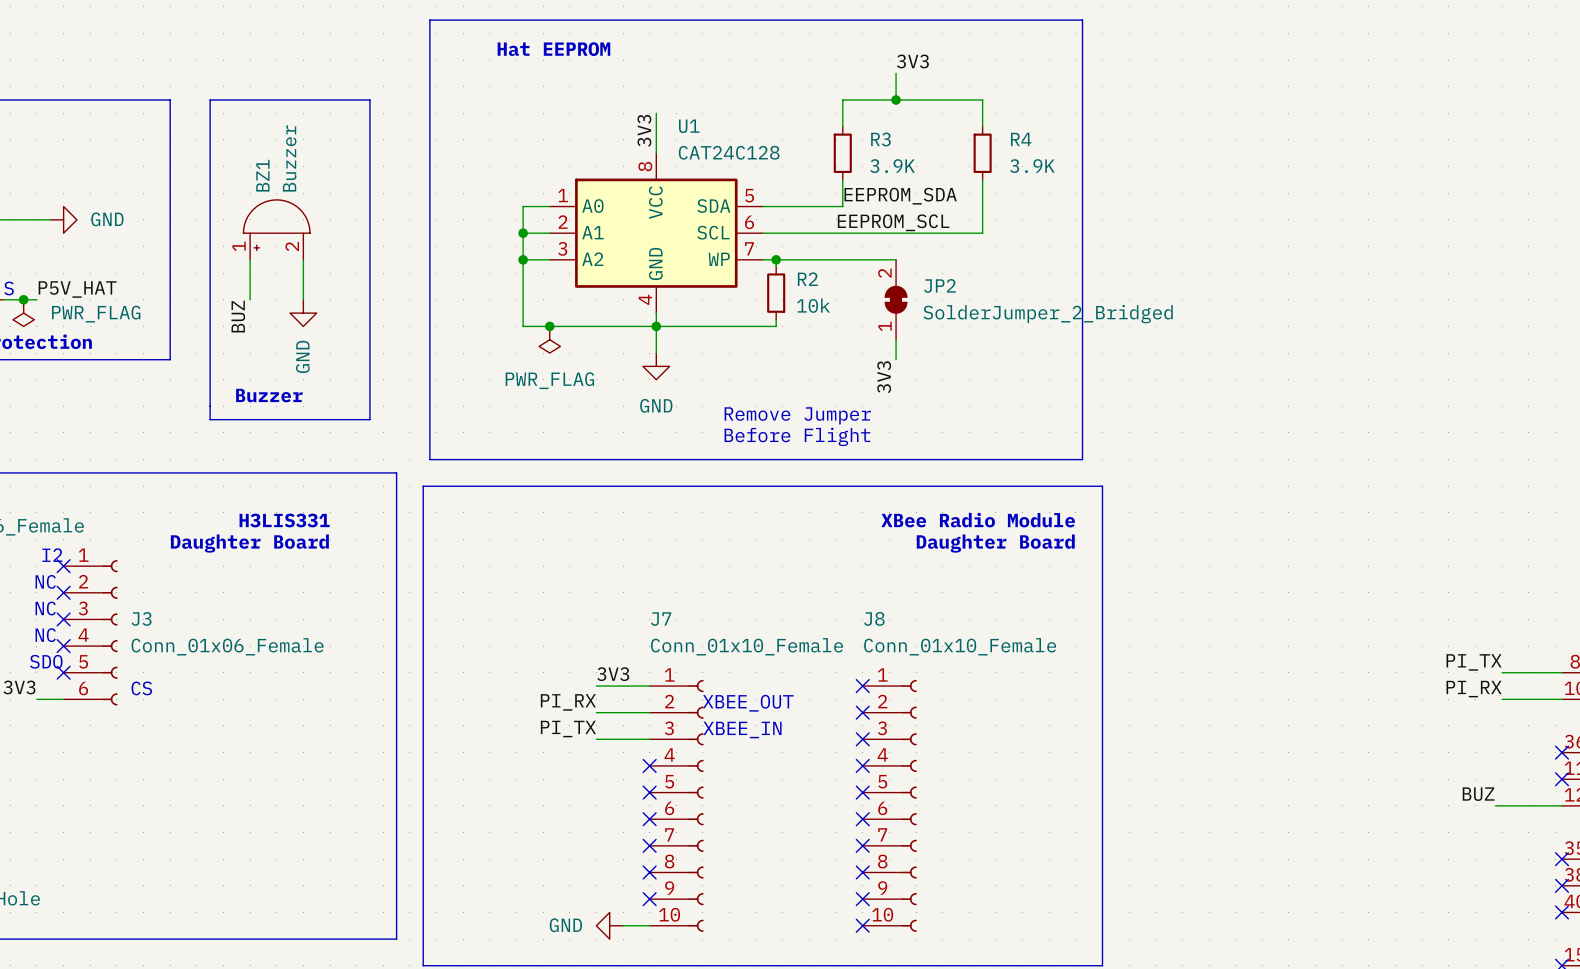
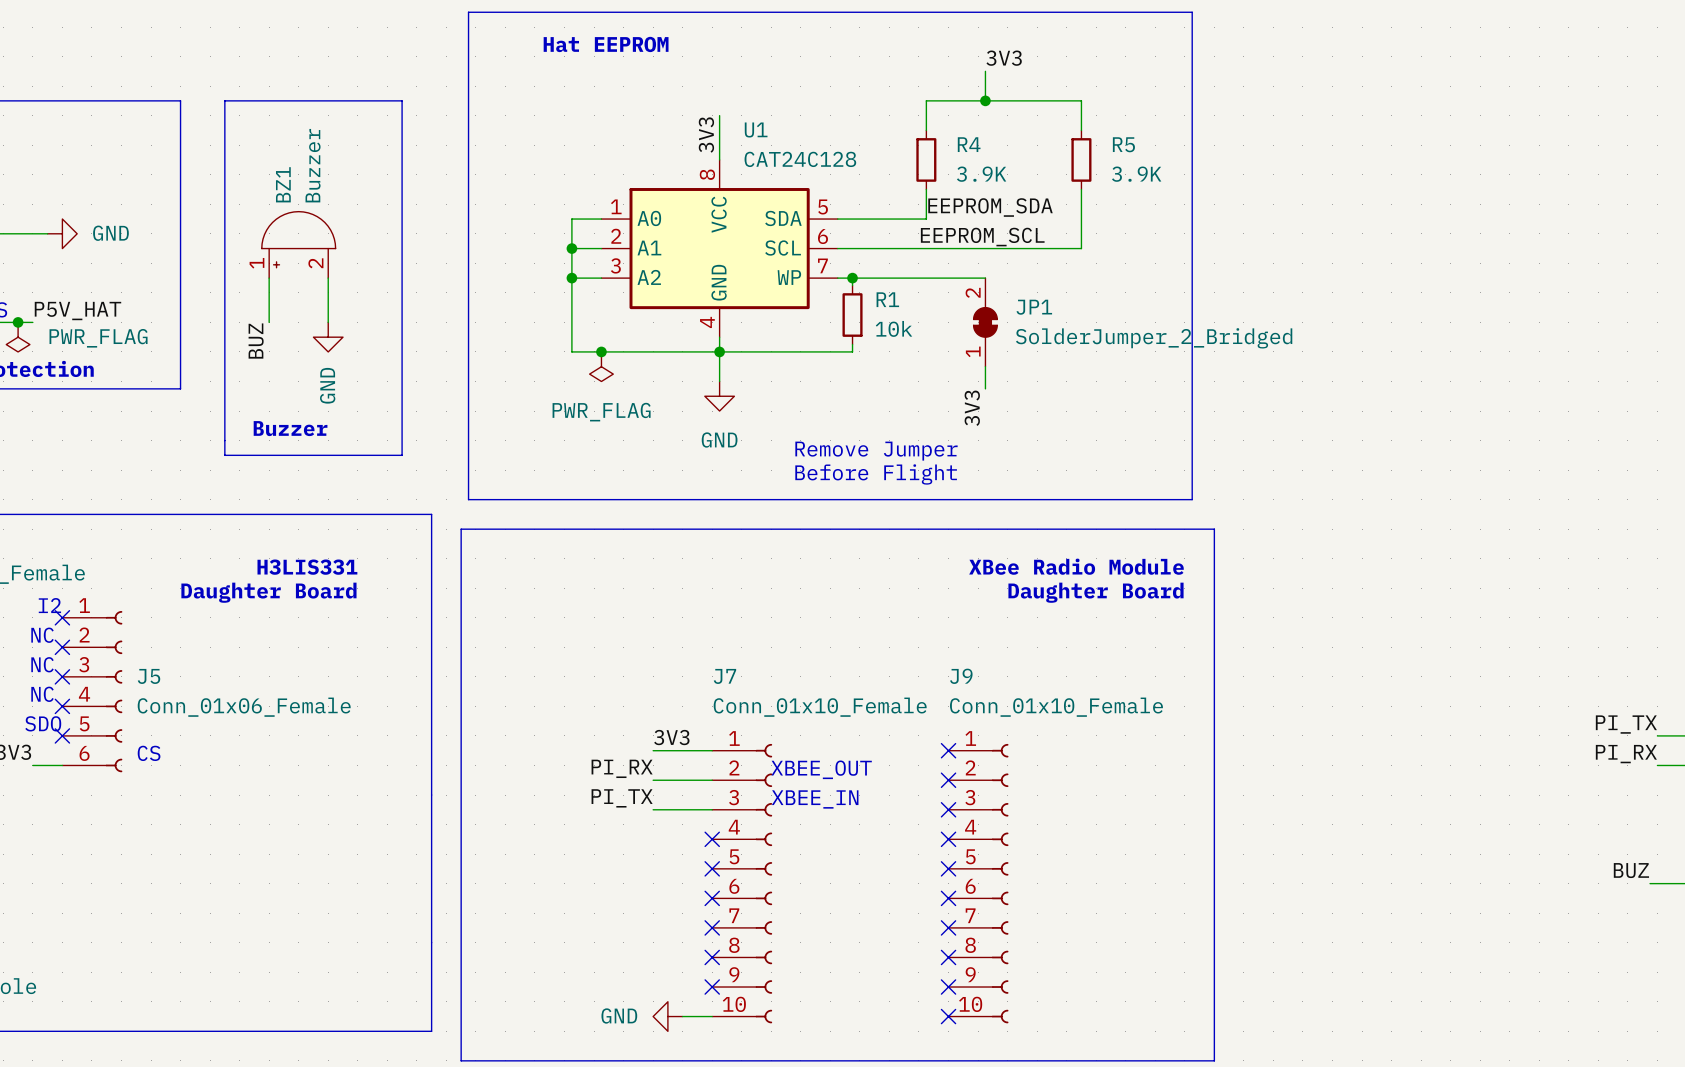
R3 name: R3 (880, 139) -> R4 (969, 144)
R4 name: R4 (1021, 139) -> R5 (1123, 144)
R2 name: R2 (807, 279) -> R1 (887, 299)
JP2 name: JP2 (939, 285) -> JP1 (1034, 307)
J3 name: J3 (141, 618) -> J5 (149, 676)
J8 name: J8 (874, 618) -> J9 (961, 676)

